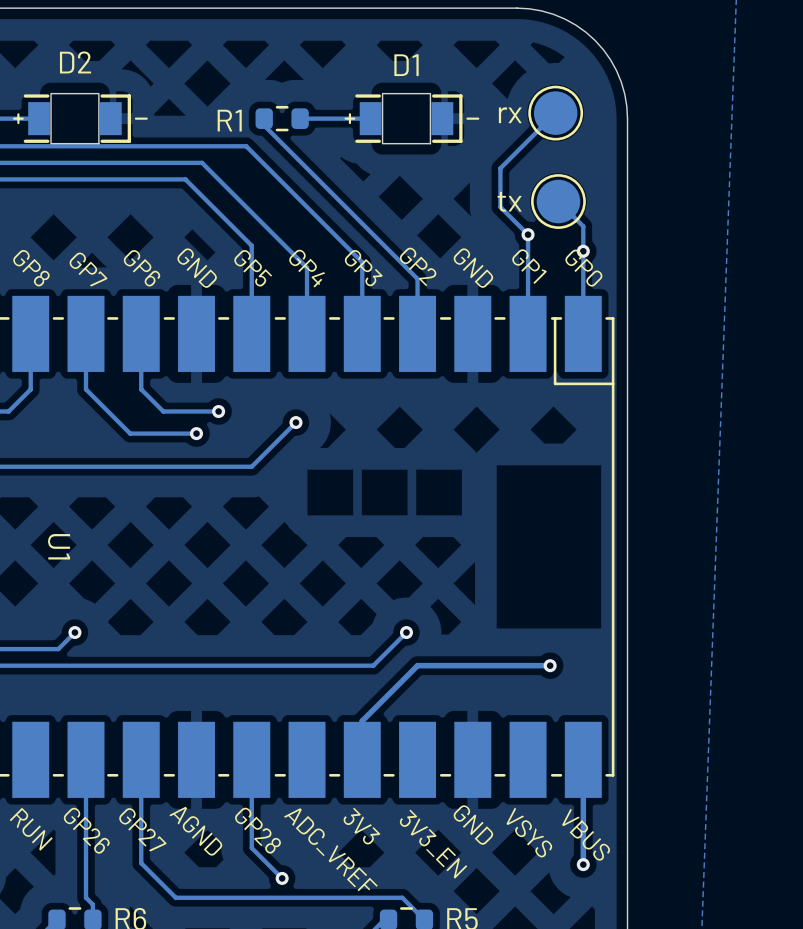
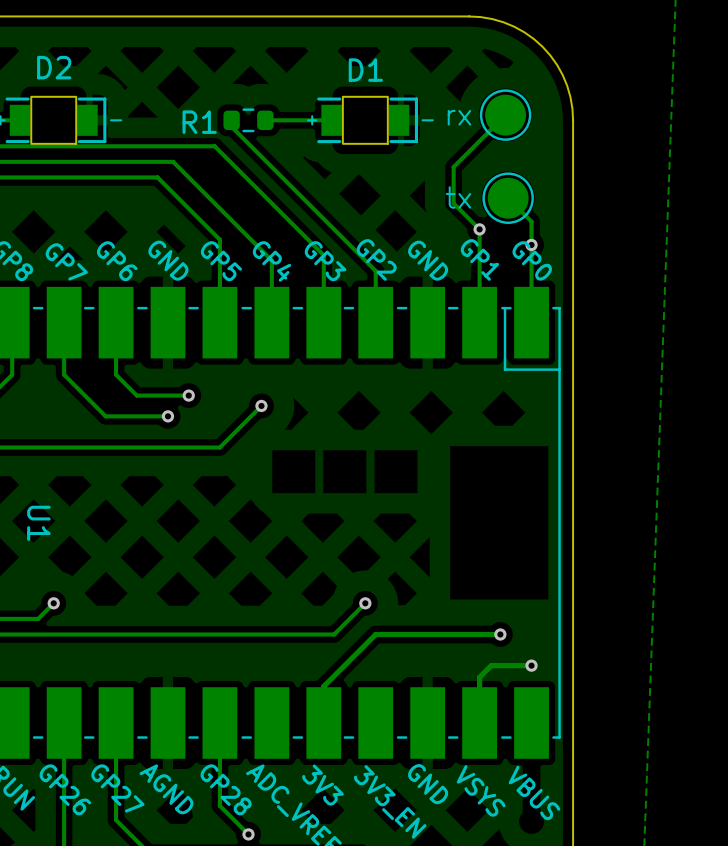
track: none -> (531, 665) (491, 665) (479, 677) (479, 704)
via: none -> (531, 665)
track: (583, 740) (583, 864) -> none
via: (583, 864) -> none

